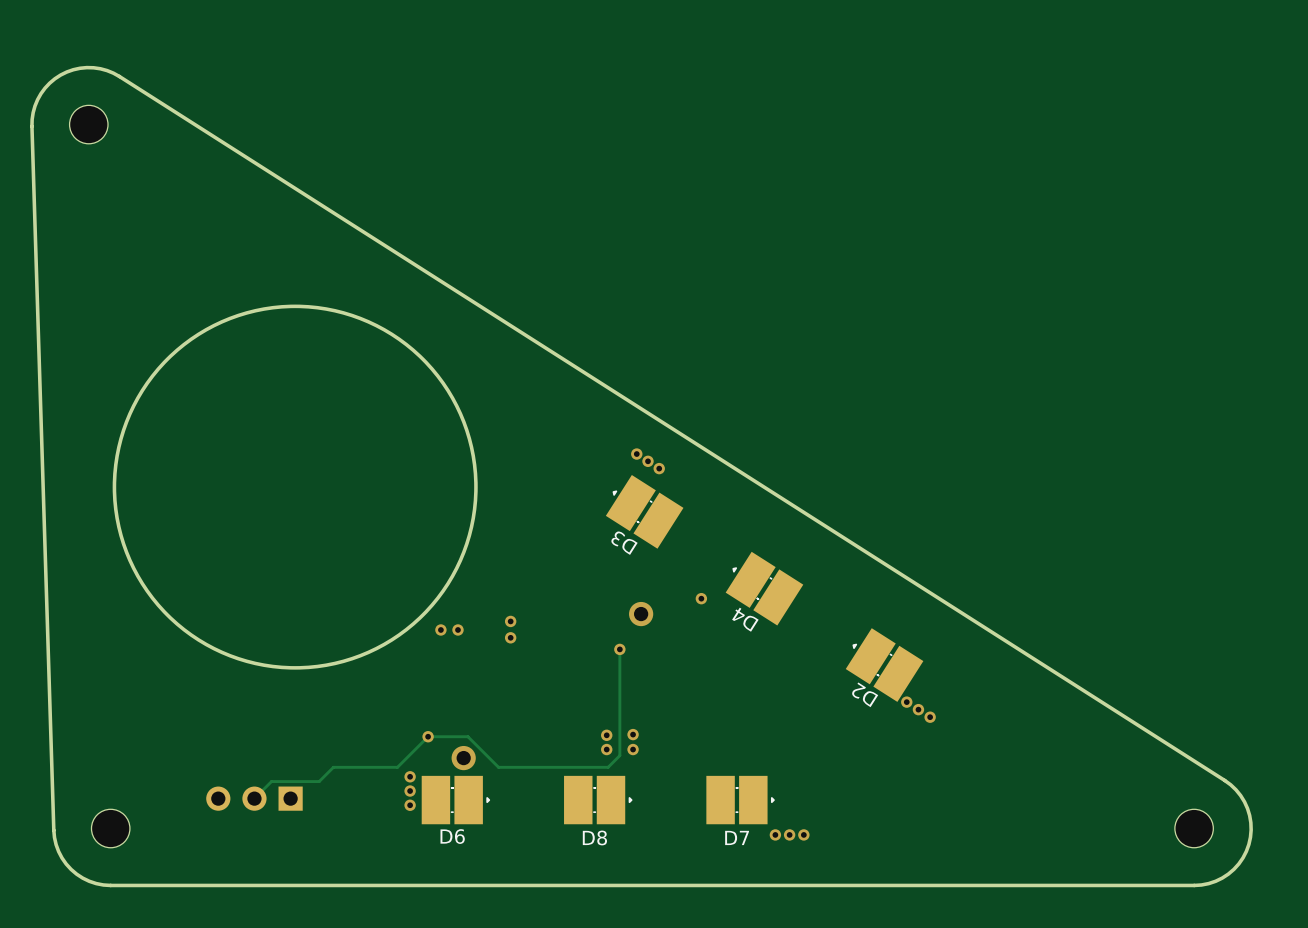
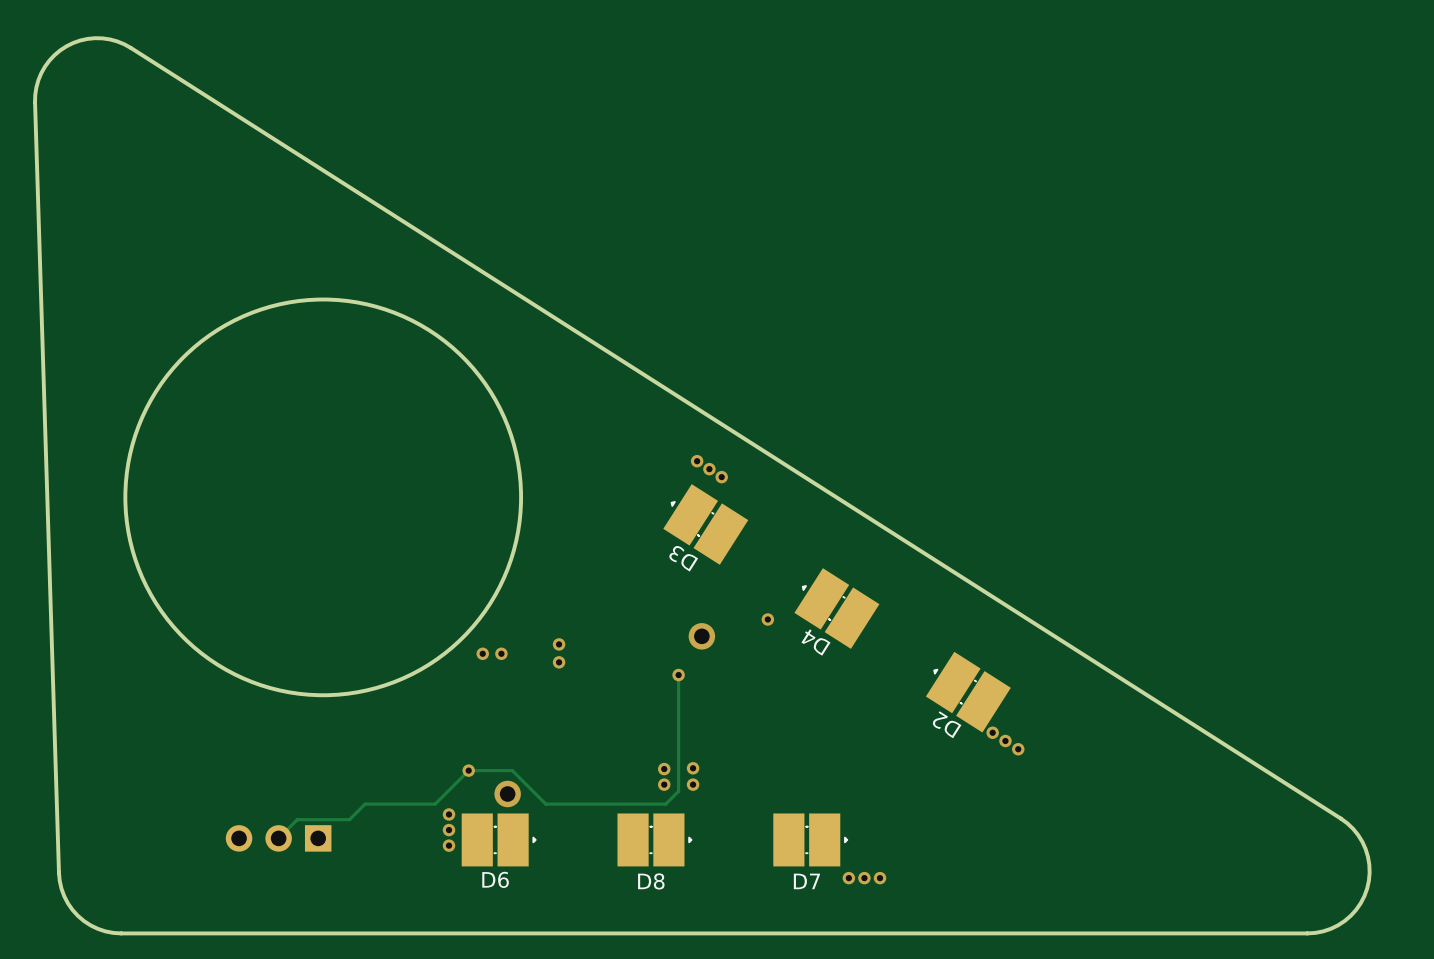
part: (88, 124) -> none
part: (110, 828) -> none
part: (1194, 828) -> none

